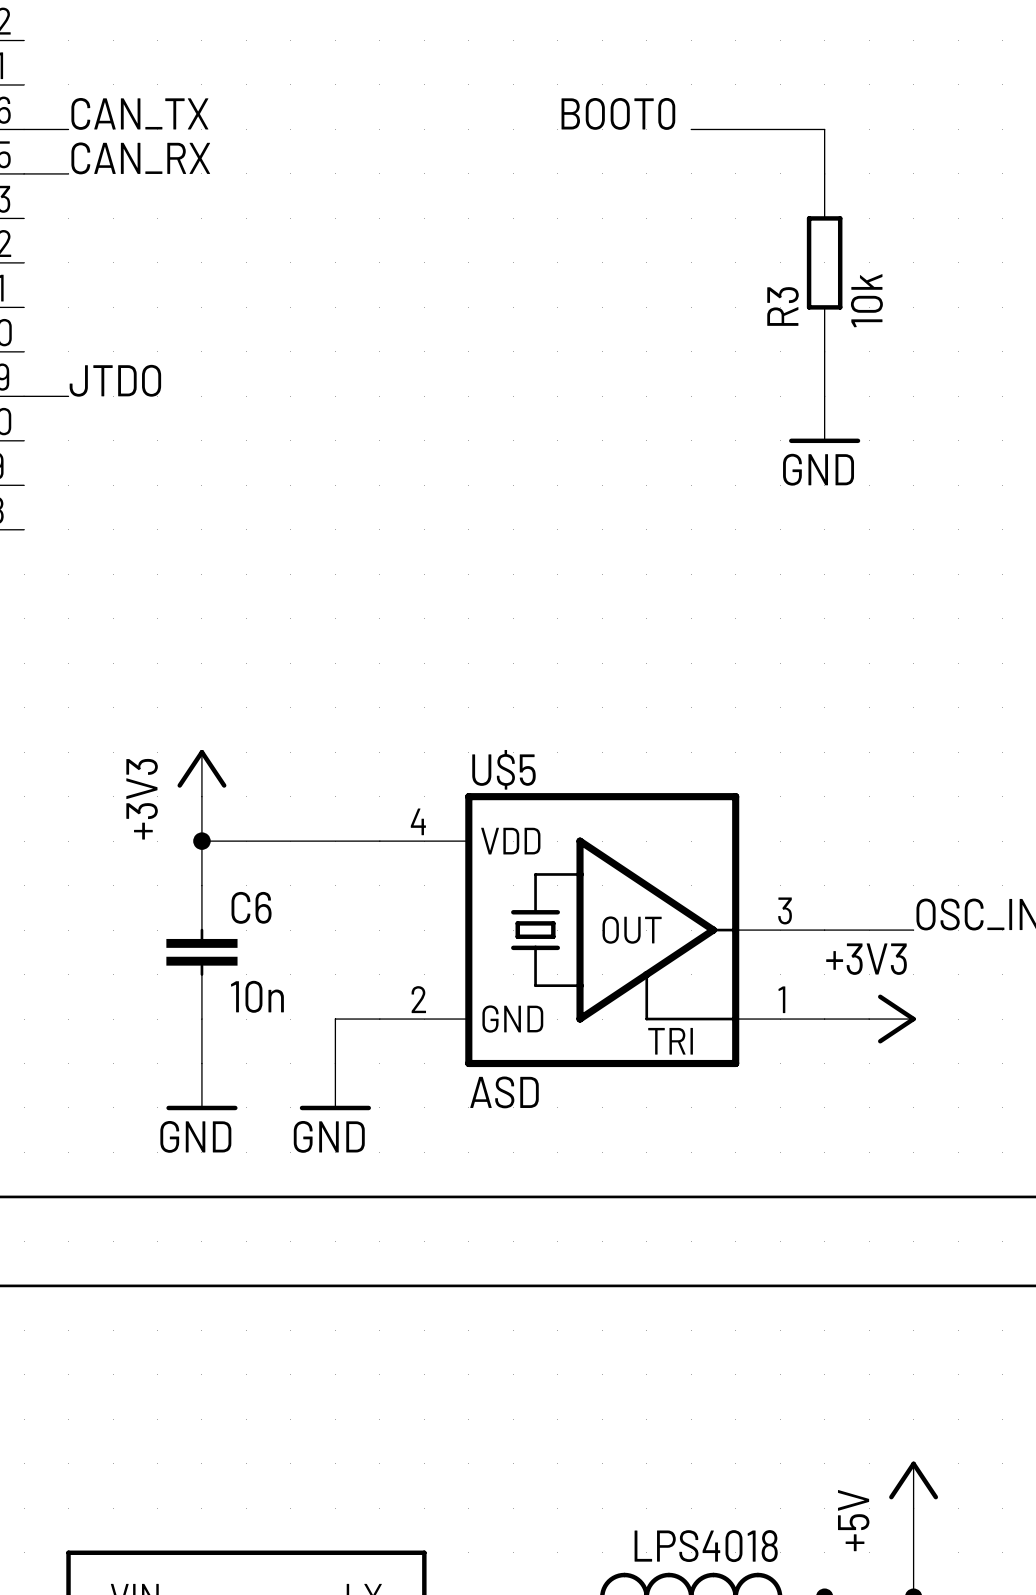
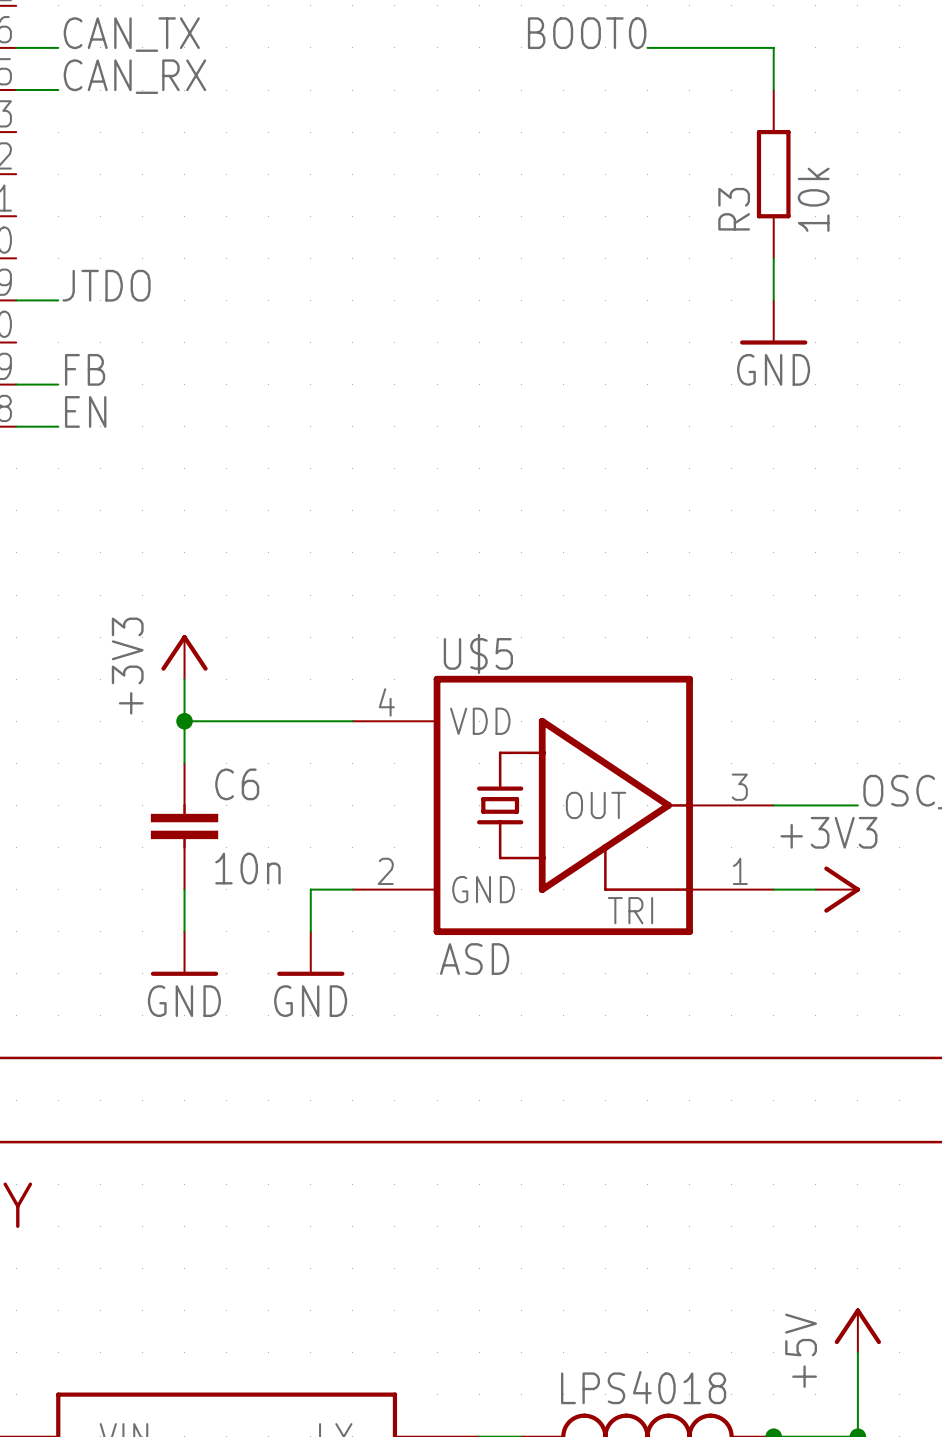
label: none -> FB (85, 369)
wire: none -> (16, 384) (58, 384)
label: none -> EN (85, 411)
wire: none -> (16, 426) (58, 426)

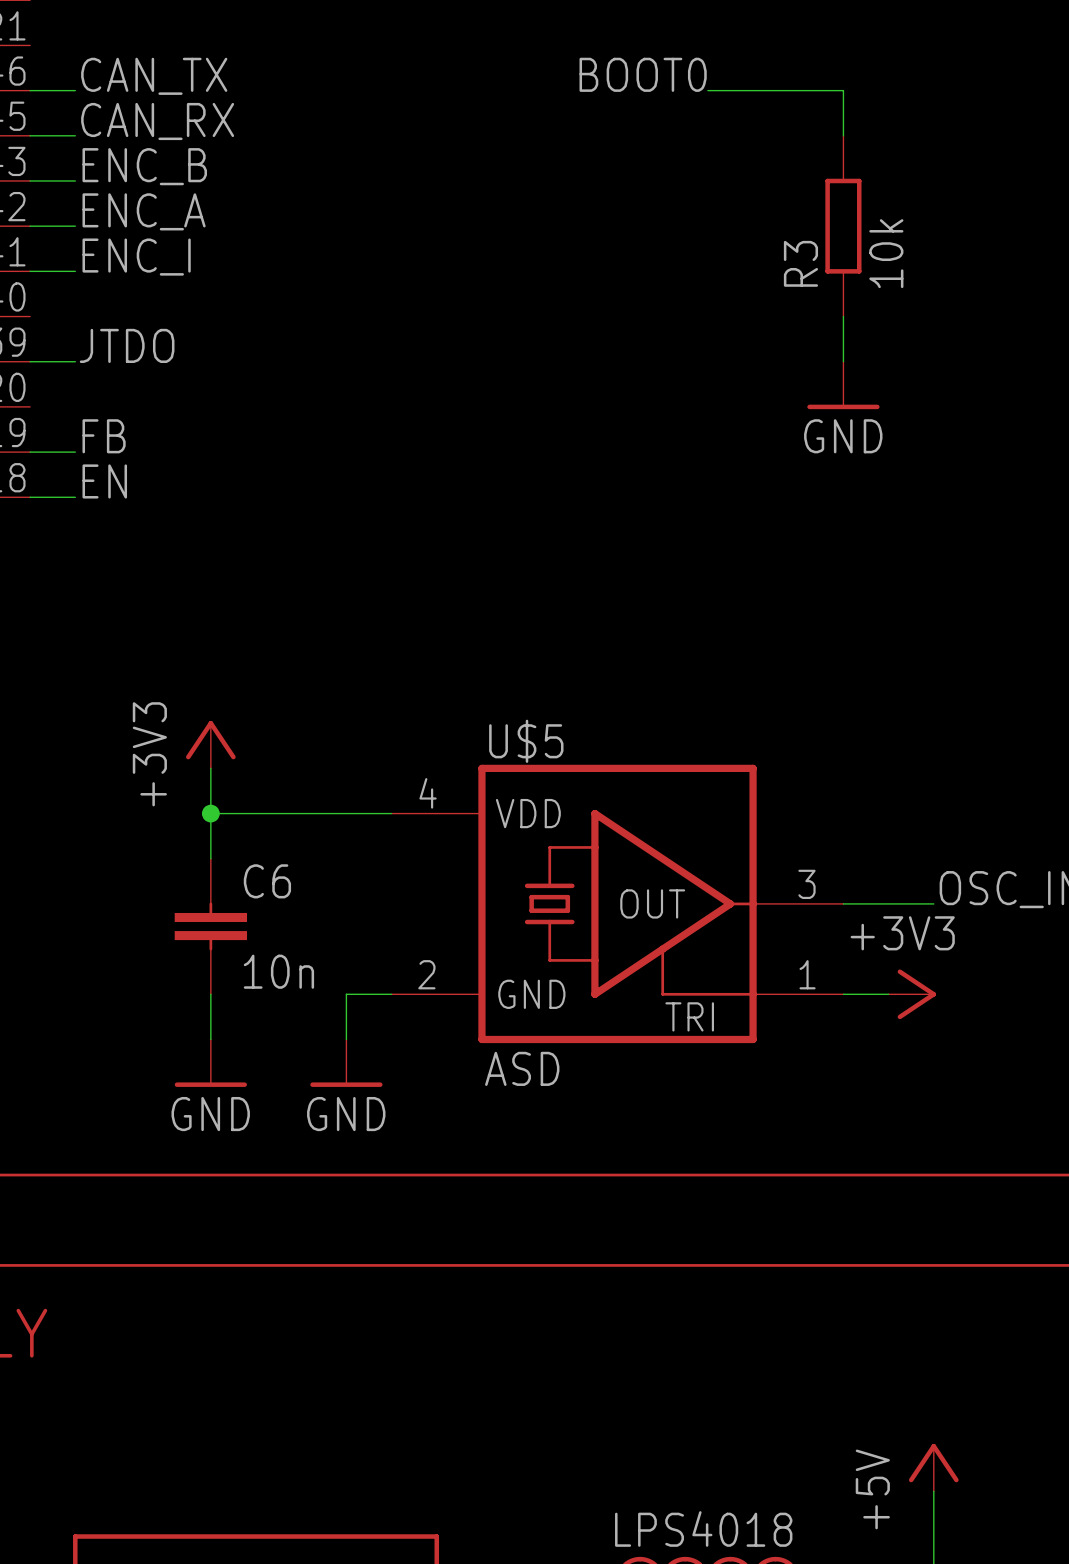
label: none -> ENC_B (144, 166)
wire: none -> (30, 180) (75, 180)
label: none -> ENC_A (144, 211)
wire: none -> (30, 226) (75, 226)
label: none -> ENC_I (136, 257)
wire: none -> (30, 271) (75, 271)

